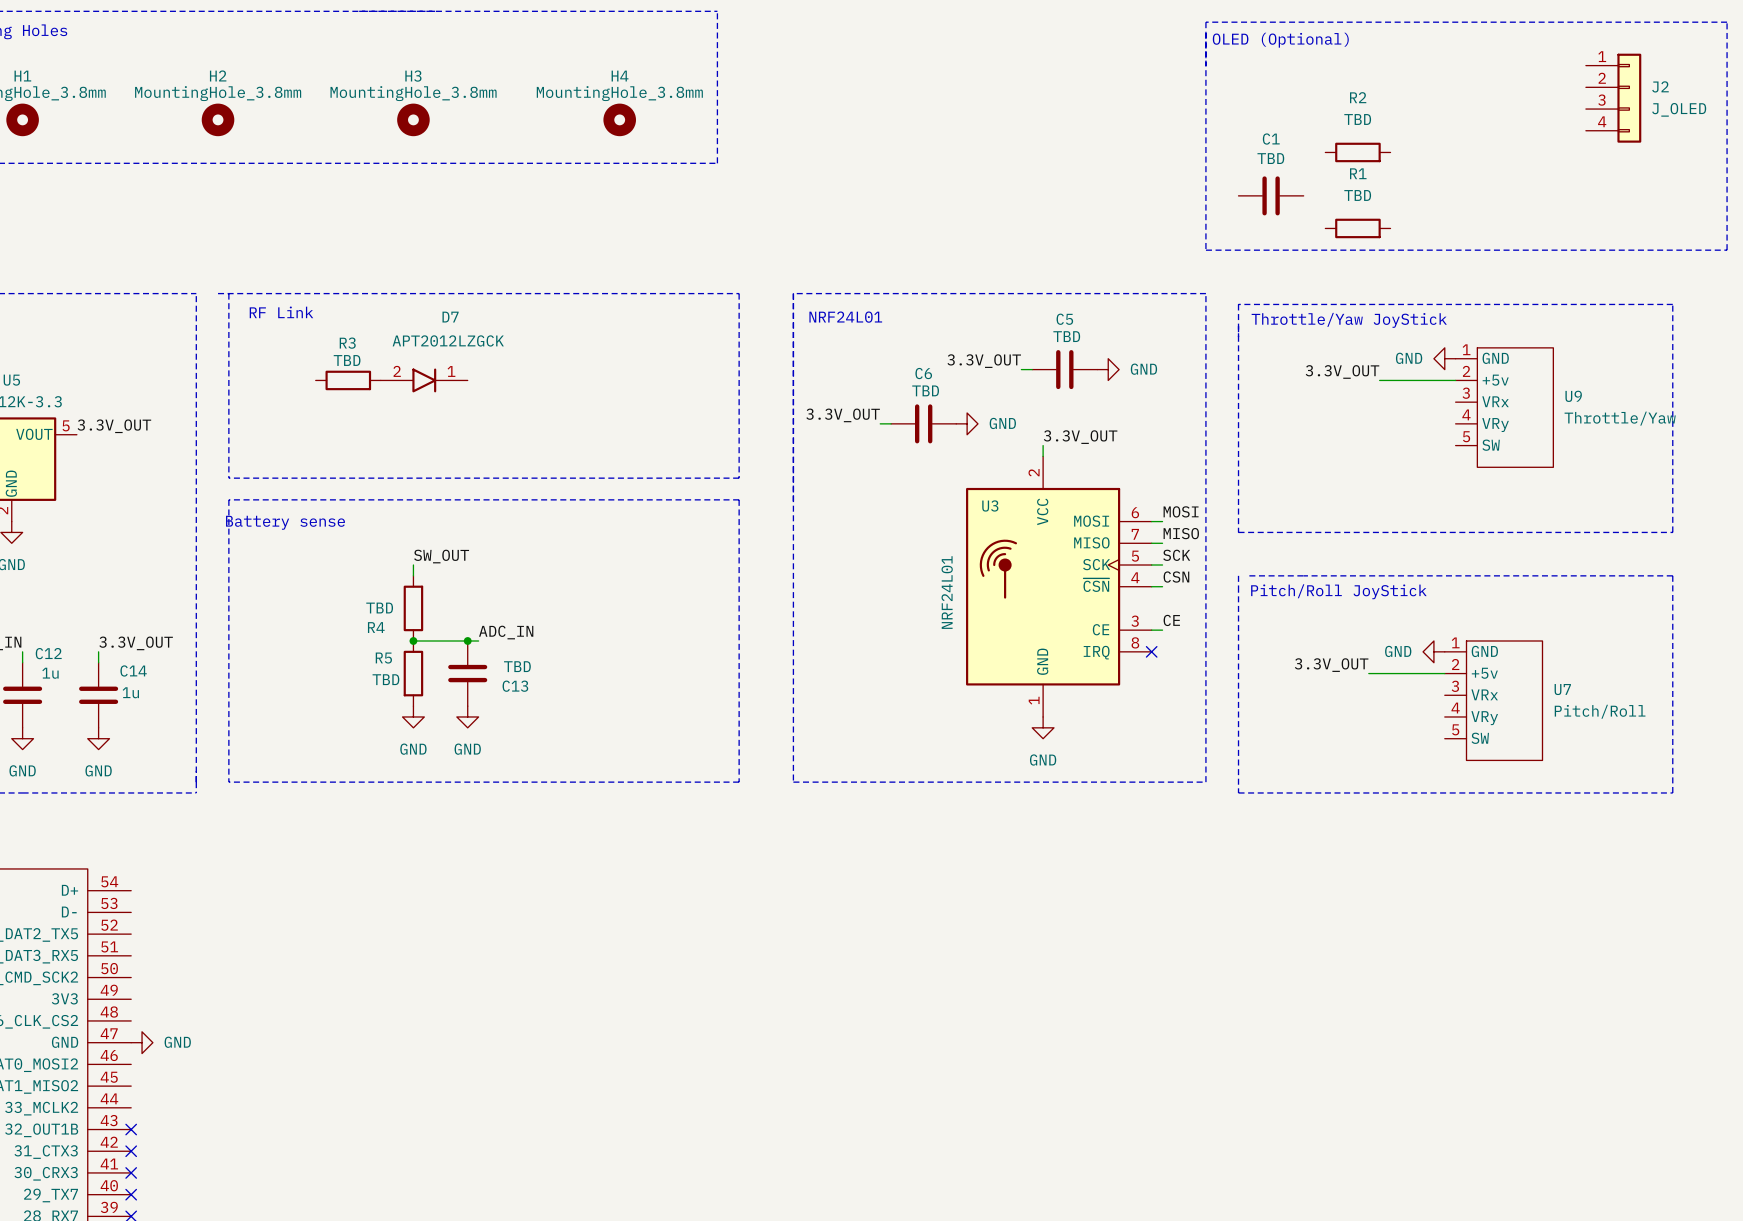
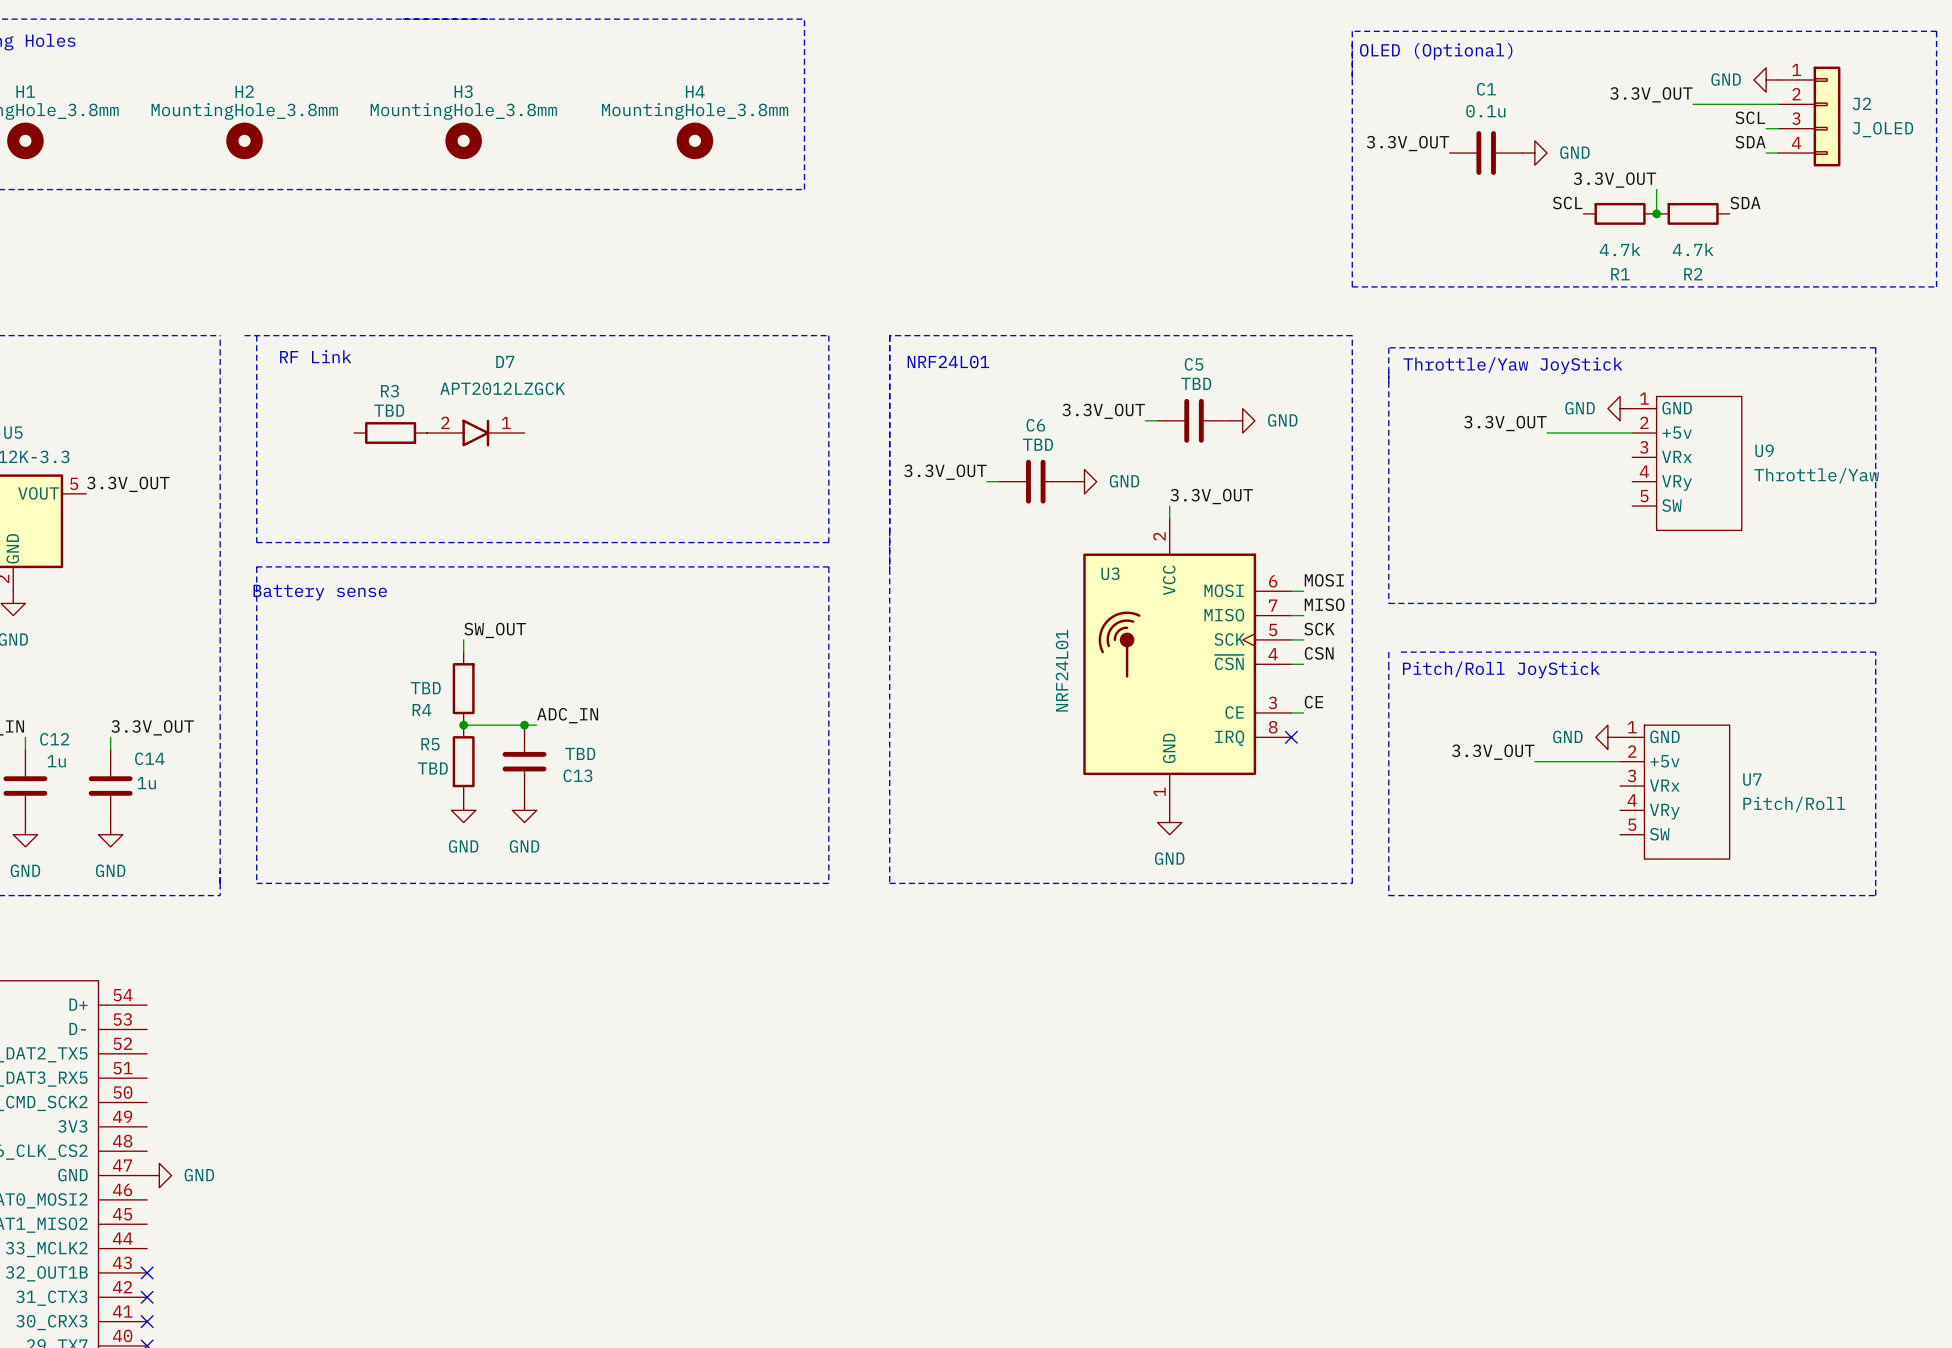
power symbol: none -> GND (1766, 79)
label: none -> 3.3V_OUT (1651, 94)
wire: none -> (1693, 104) (1778, 104)
R2 name position: R2 (1358, 97) -> R2 (1693, 274)
label: none -> SCL (1750, 117)
wire: none -> (1766, 128) (1778, 128)
R2 value: TBD (1357, 119) -> 4.7k (1693, 249)
label: none -> SDA (1750, 142)
label: none -> 3.3V_OUT (1408, 143)
power symbol: none -> GND (1534, 153)
wire: none -> (1766, 153) (1778, 153)
R2 position: (1357, 152) -> (1693, 213)
label: none -> 3.3V_OUT (1614, 180)
C1 value: TBD (1270, 158) -> 0.1u (1485, 111)
wire: none -> (1656, 189) (1656, 213)
R1 name position: R1 (1358, 173) -> R1 (1620, 274)
label: none -> SCL (1567, 203)
label: none -> SDA (1745, 203)
junction: none -> (1656, 213)
C1 position: (1271, 195) -> (1486, 153)
R1 value: TBD (1357, 195) -> 4.7k (1620, 249)
R1 position: (1357, 228) -> (1620, 213)

